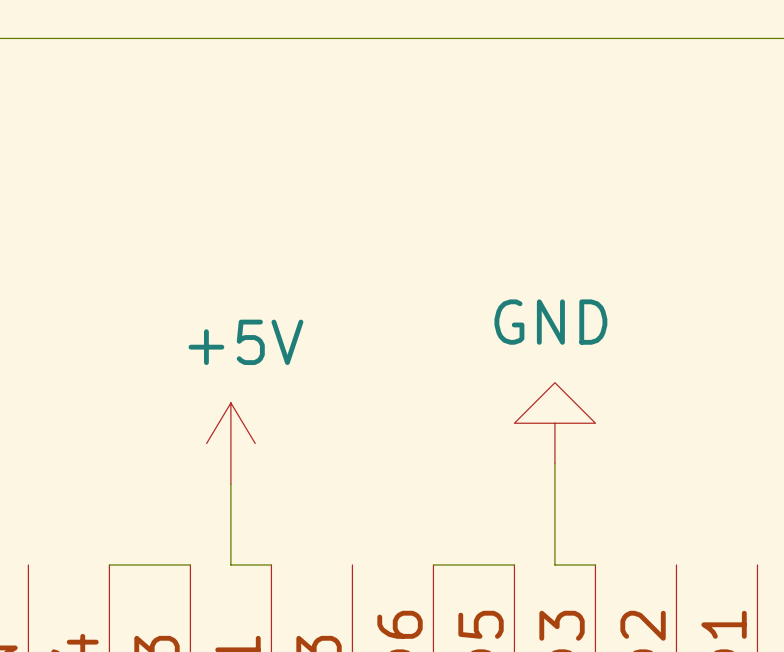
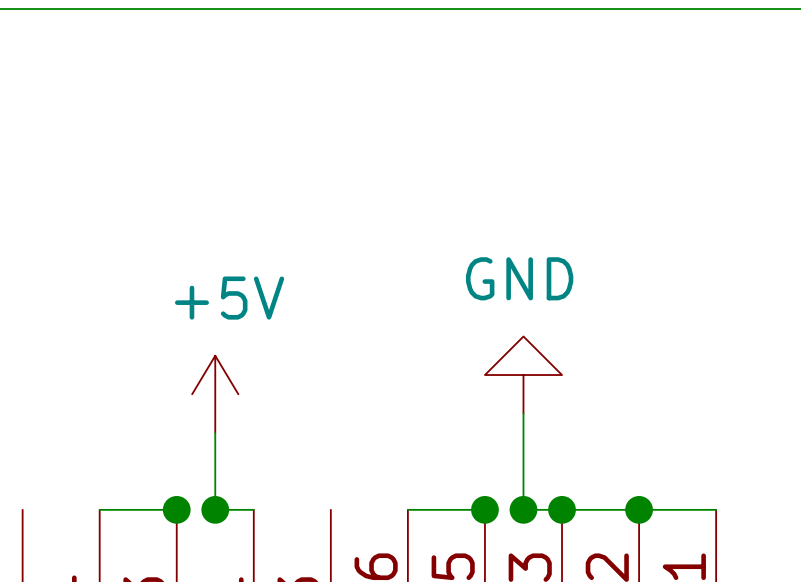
junction: none -> (176, 509)
junction: none -> (215, 509)
junction: none -> (484, 509)
junction: none -> (523, 509)
wire: none -> (562, 509) (716, 509)
junction: none -> (562, 509)
junction: none -> (639, 509)

